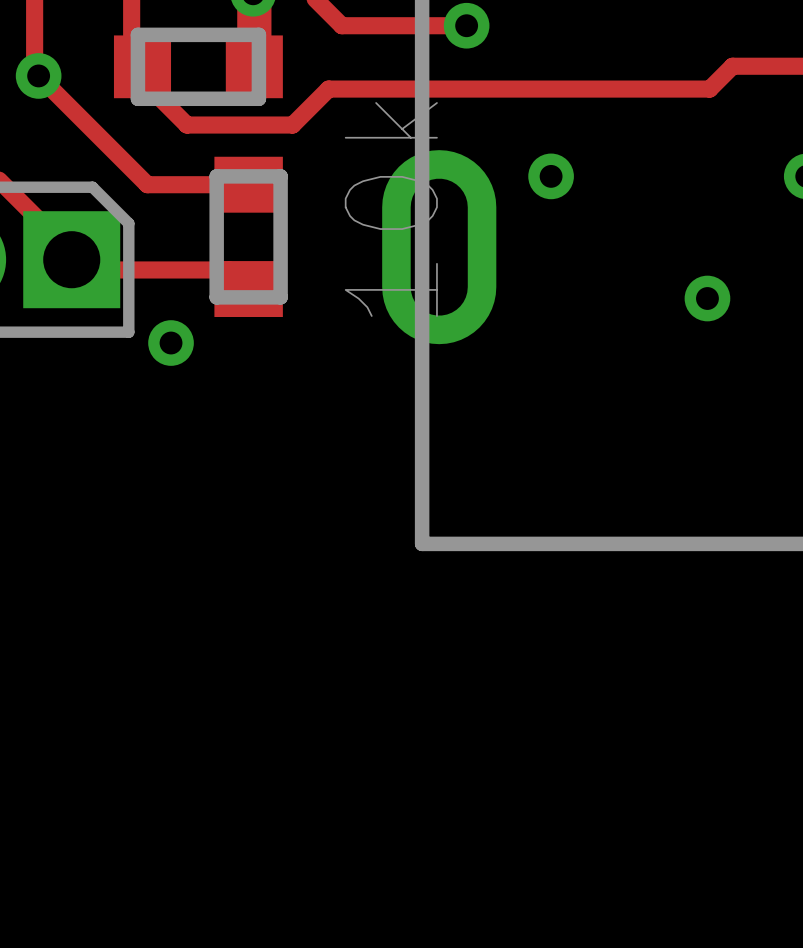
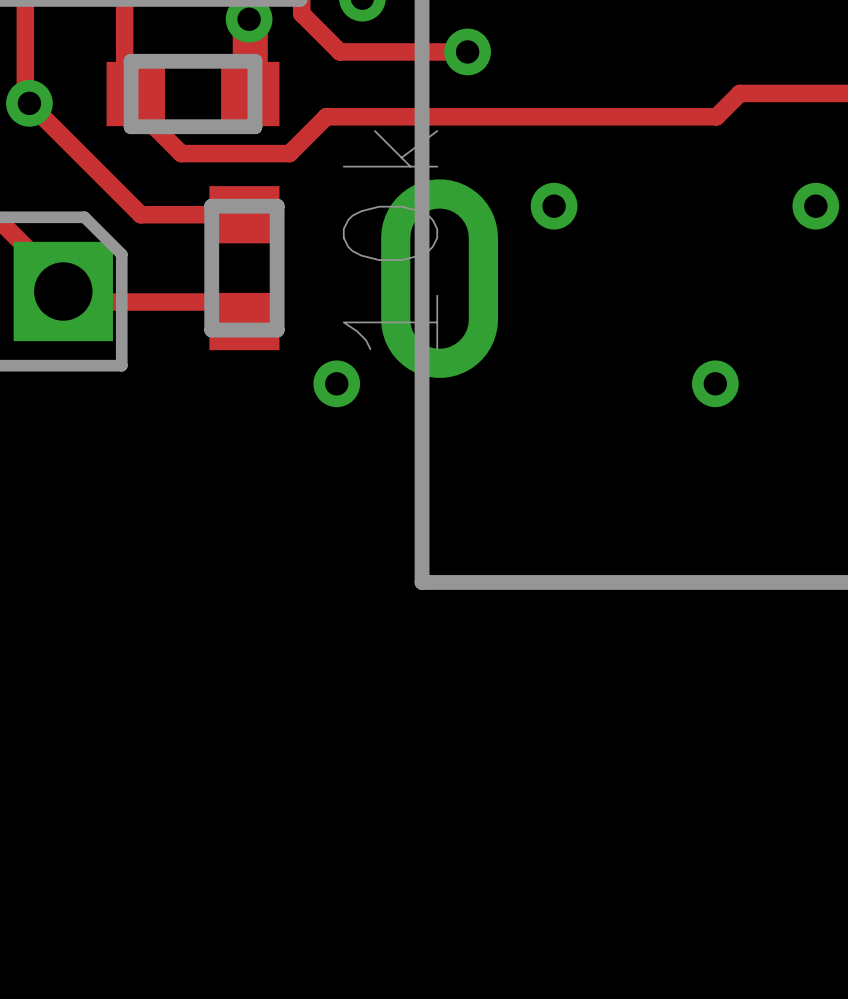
via position: (707, 298) -> (715, 383)
via: (171, 343) -> none
via: none -> (336, 383)

